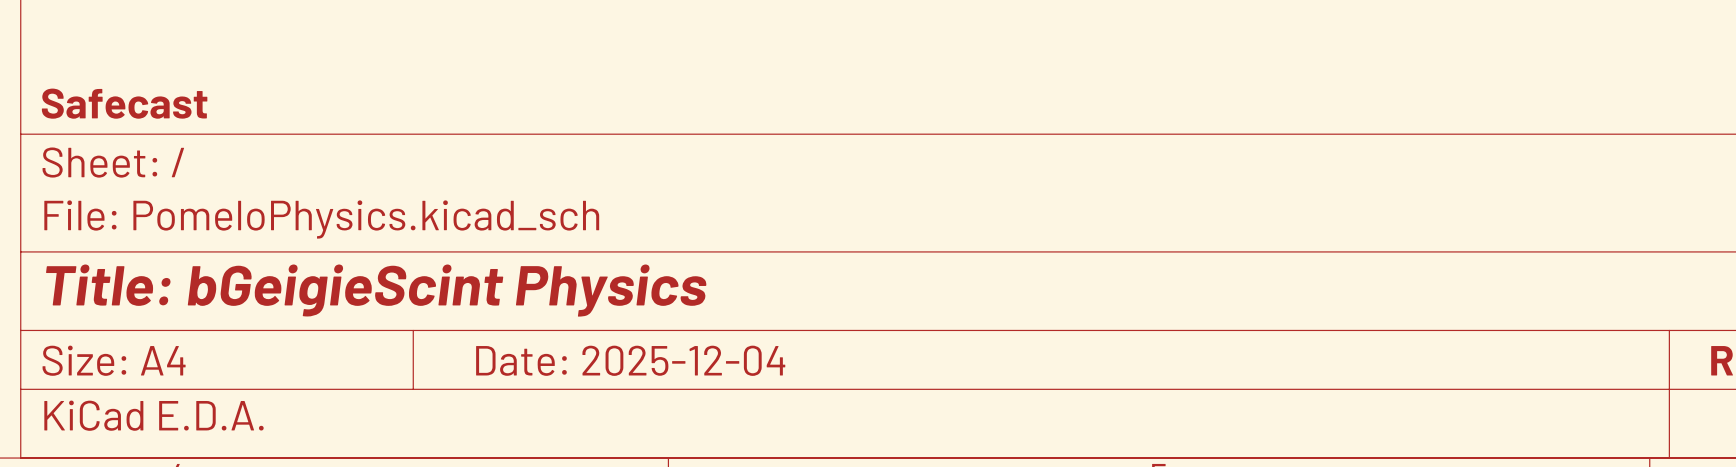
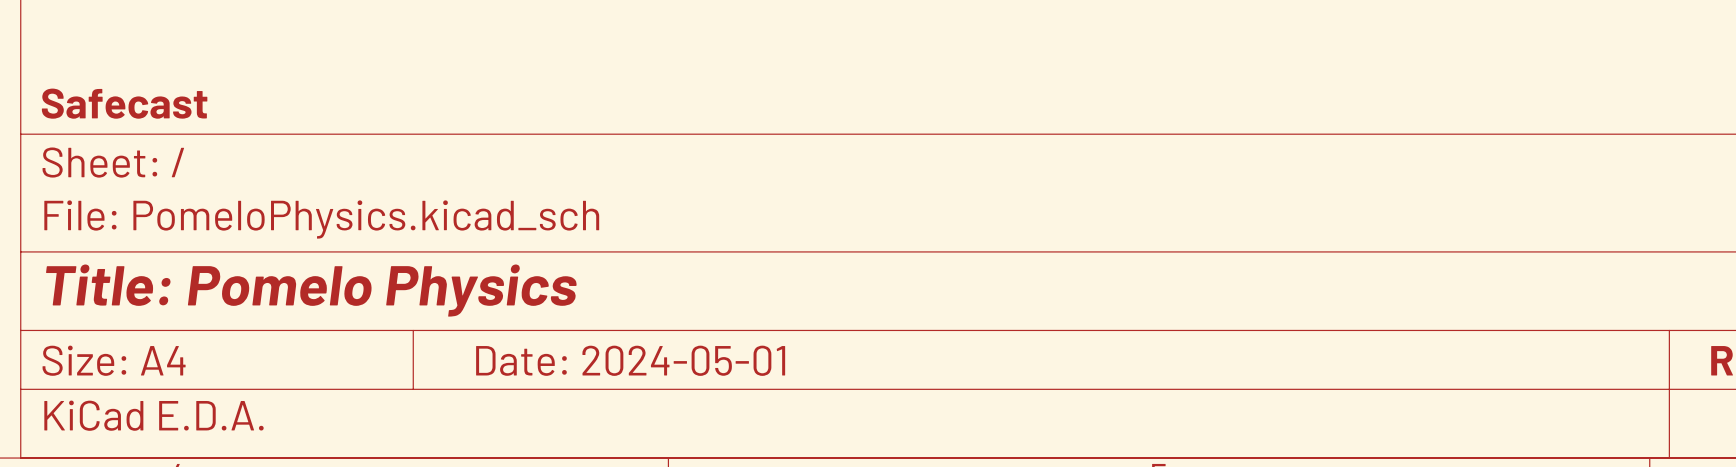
title block: Title: bGeigieScint Physics (376, 290) -> Title: Pomelo Physics (311, 290)
title block: Date: 2025-12-04 (630, 360) -> Date: 2024-05-01 (630, 360)

